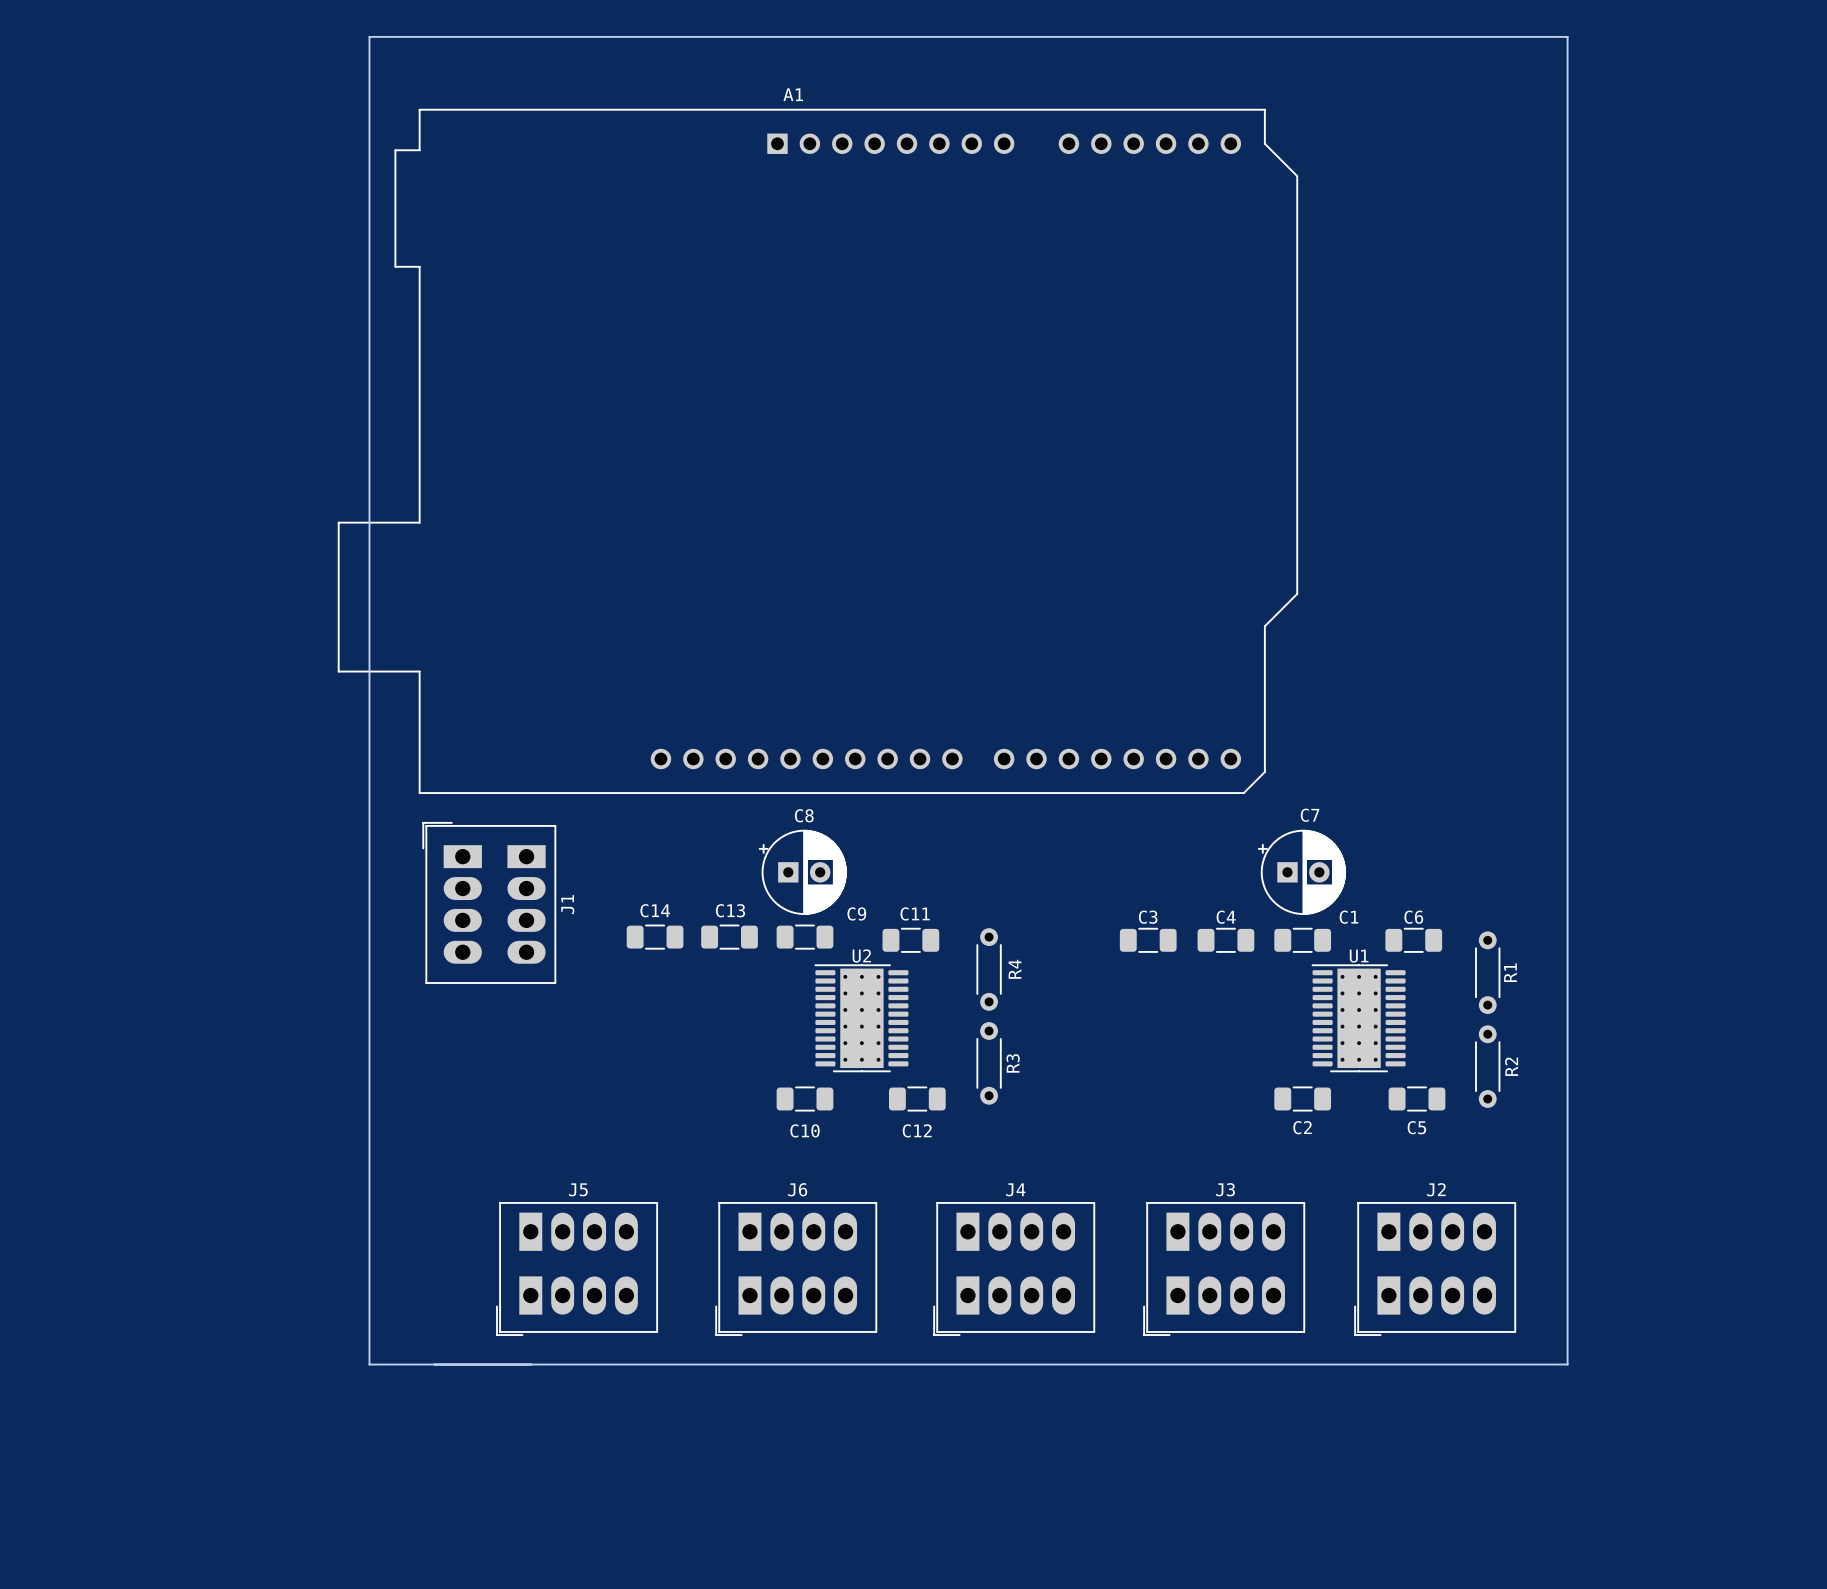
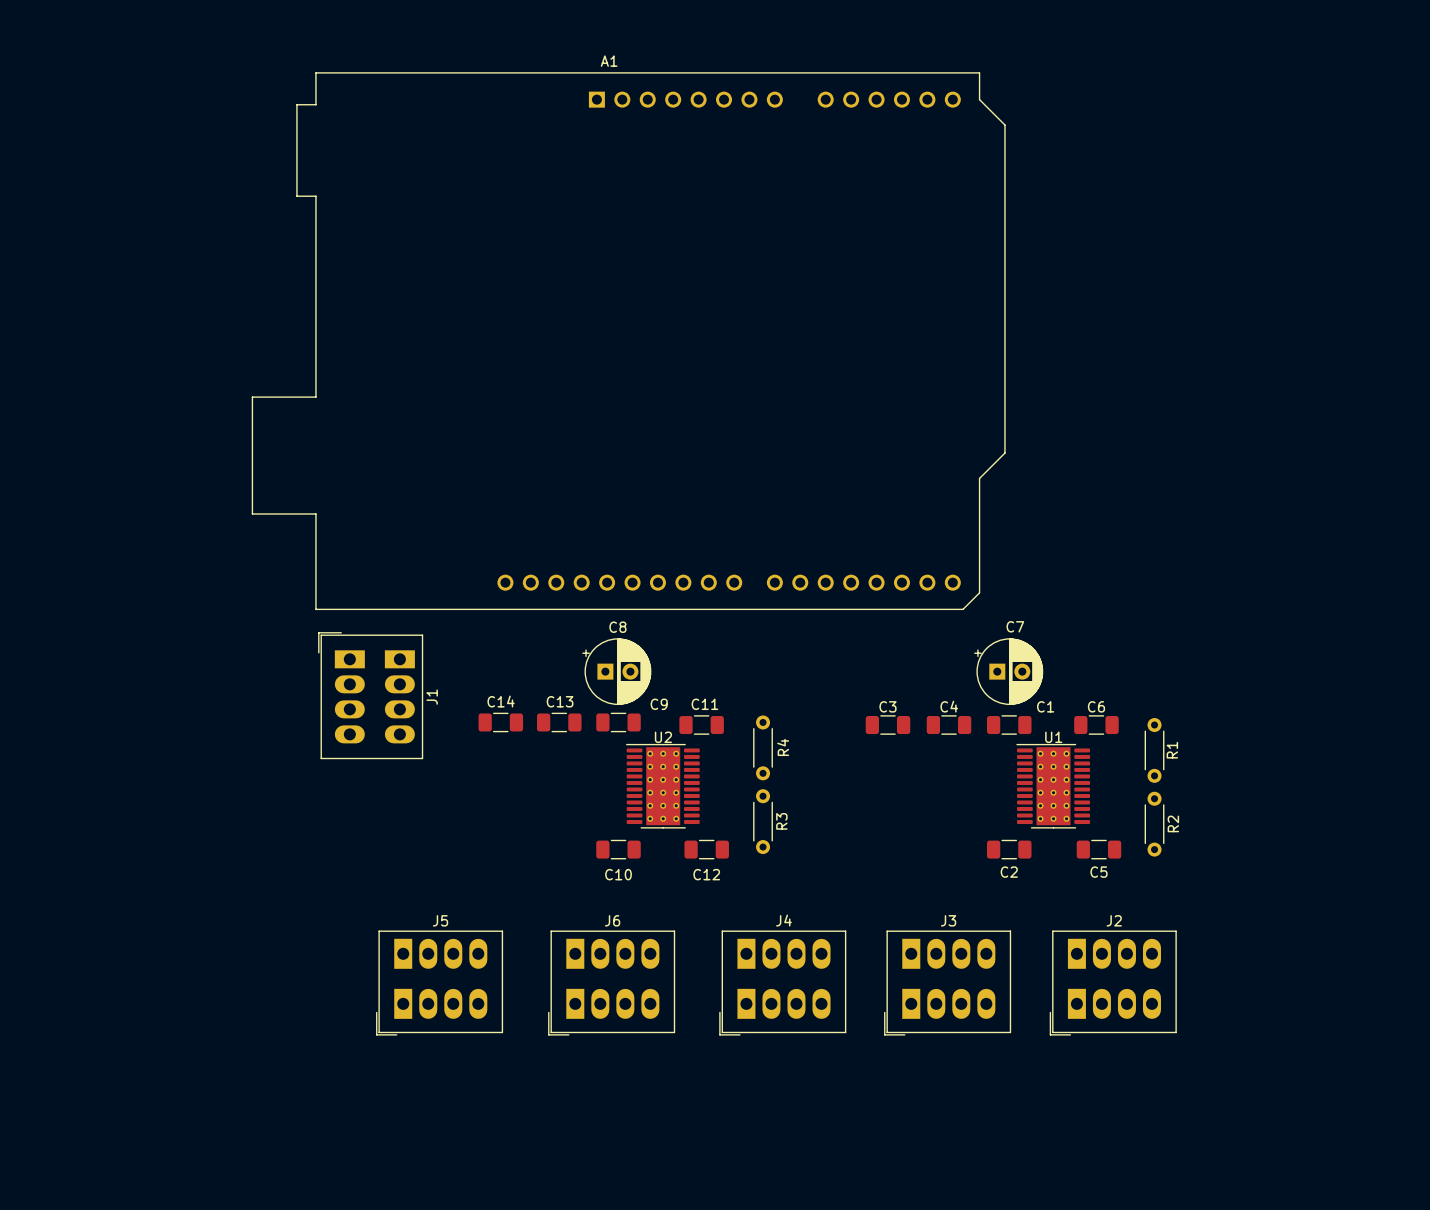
board edge: (369, 36) (1567, 36) (1567, 1364) (369, 1364) (369, 36) -> none

